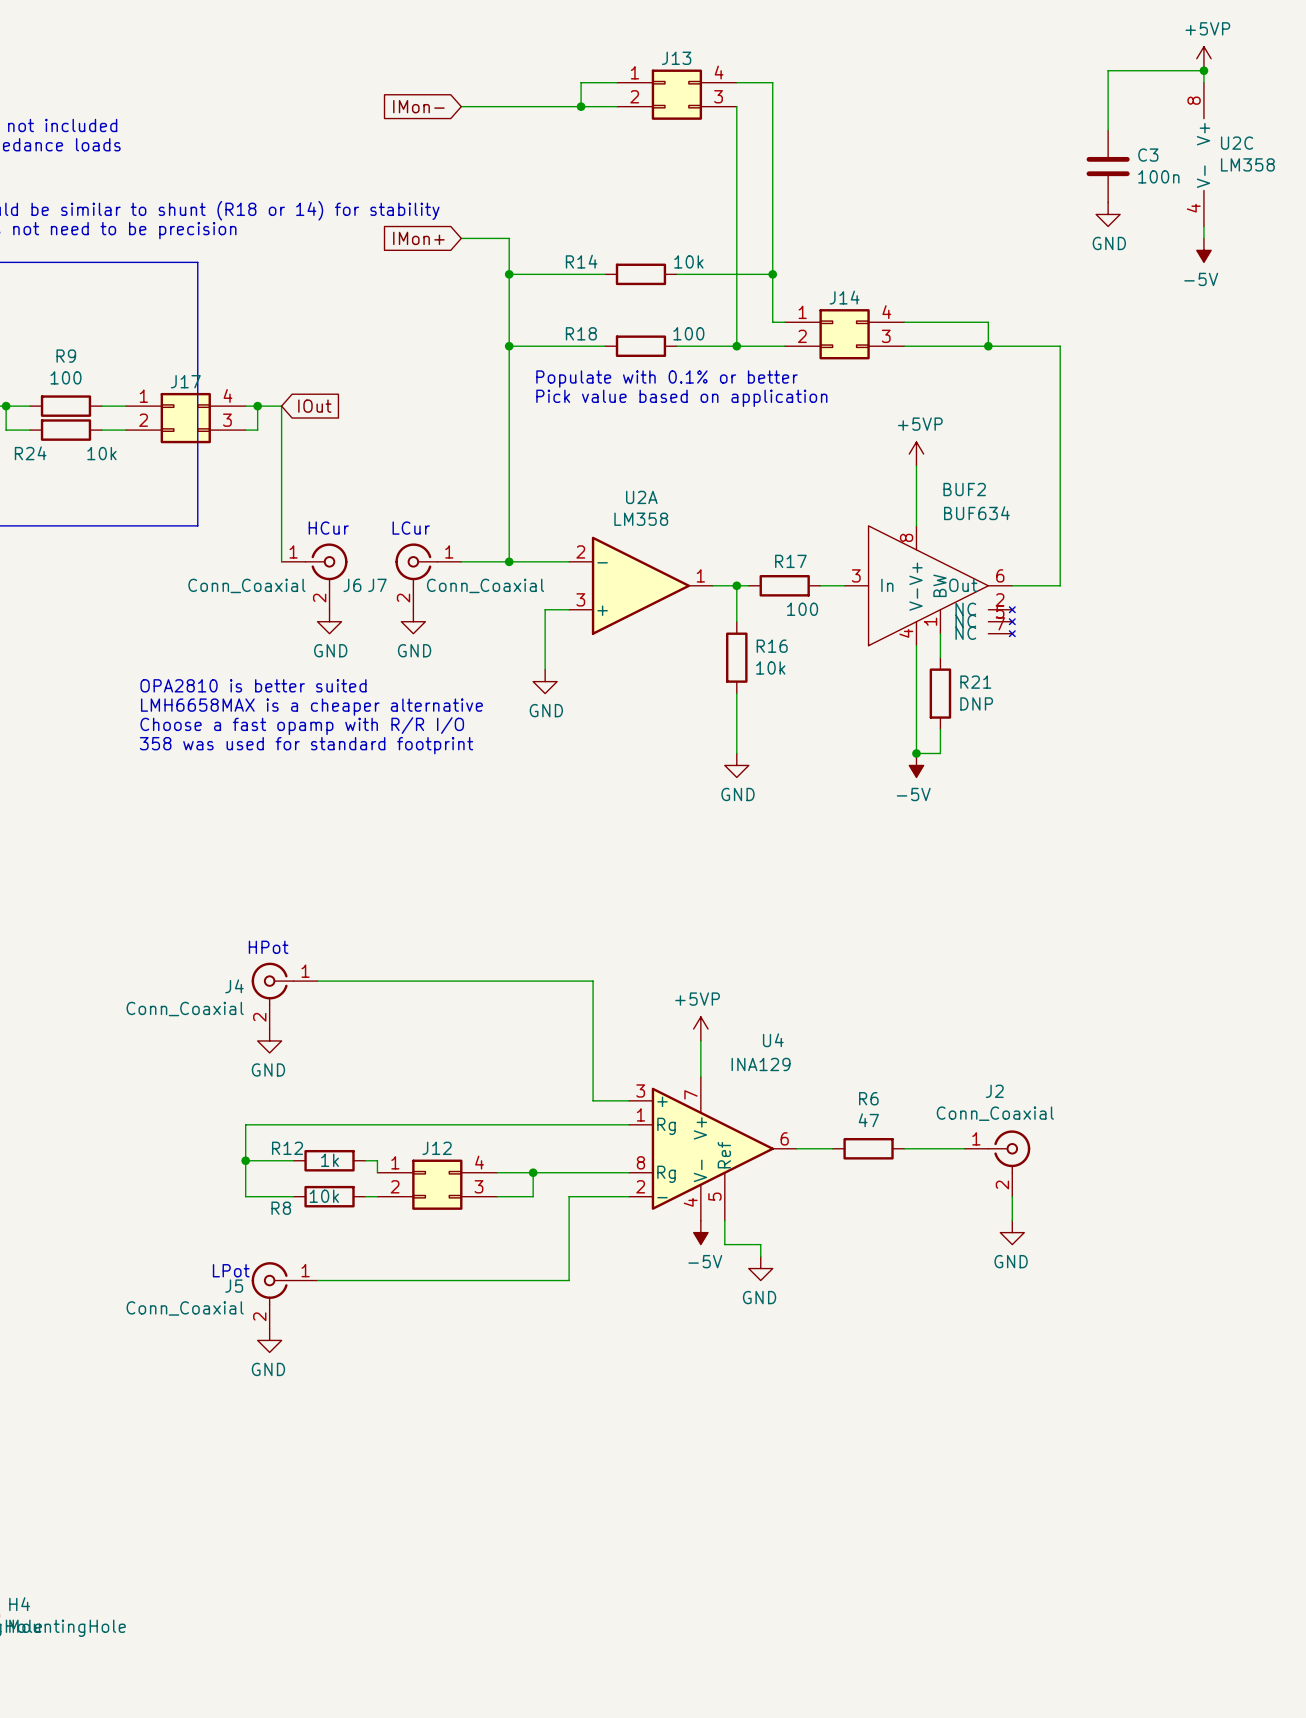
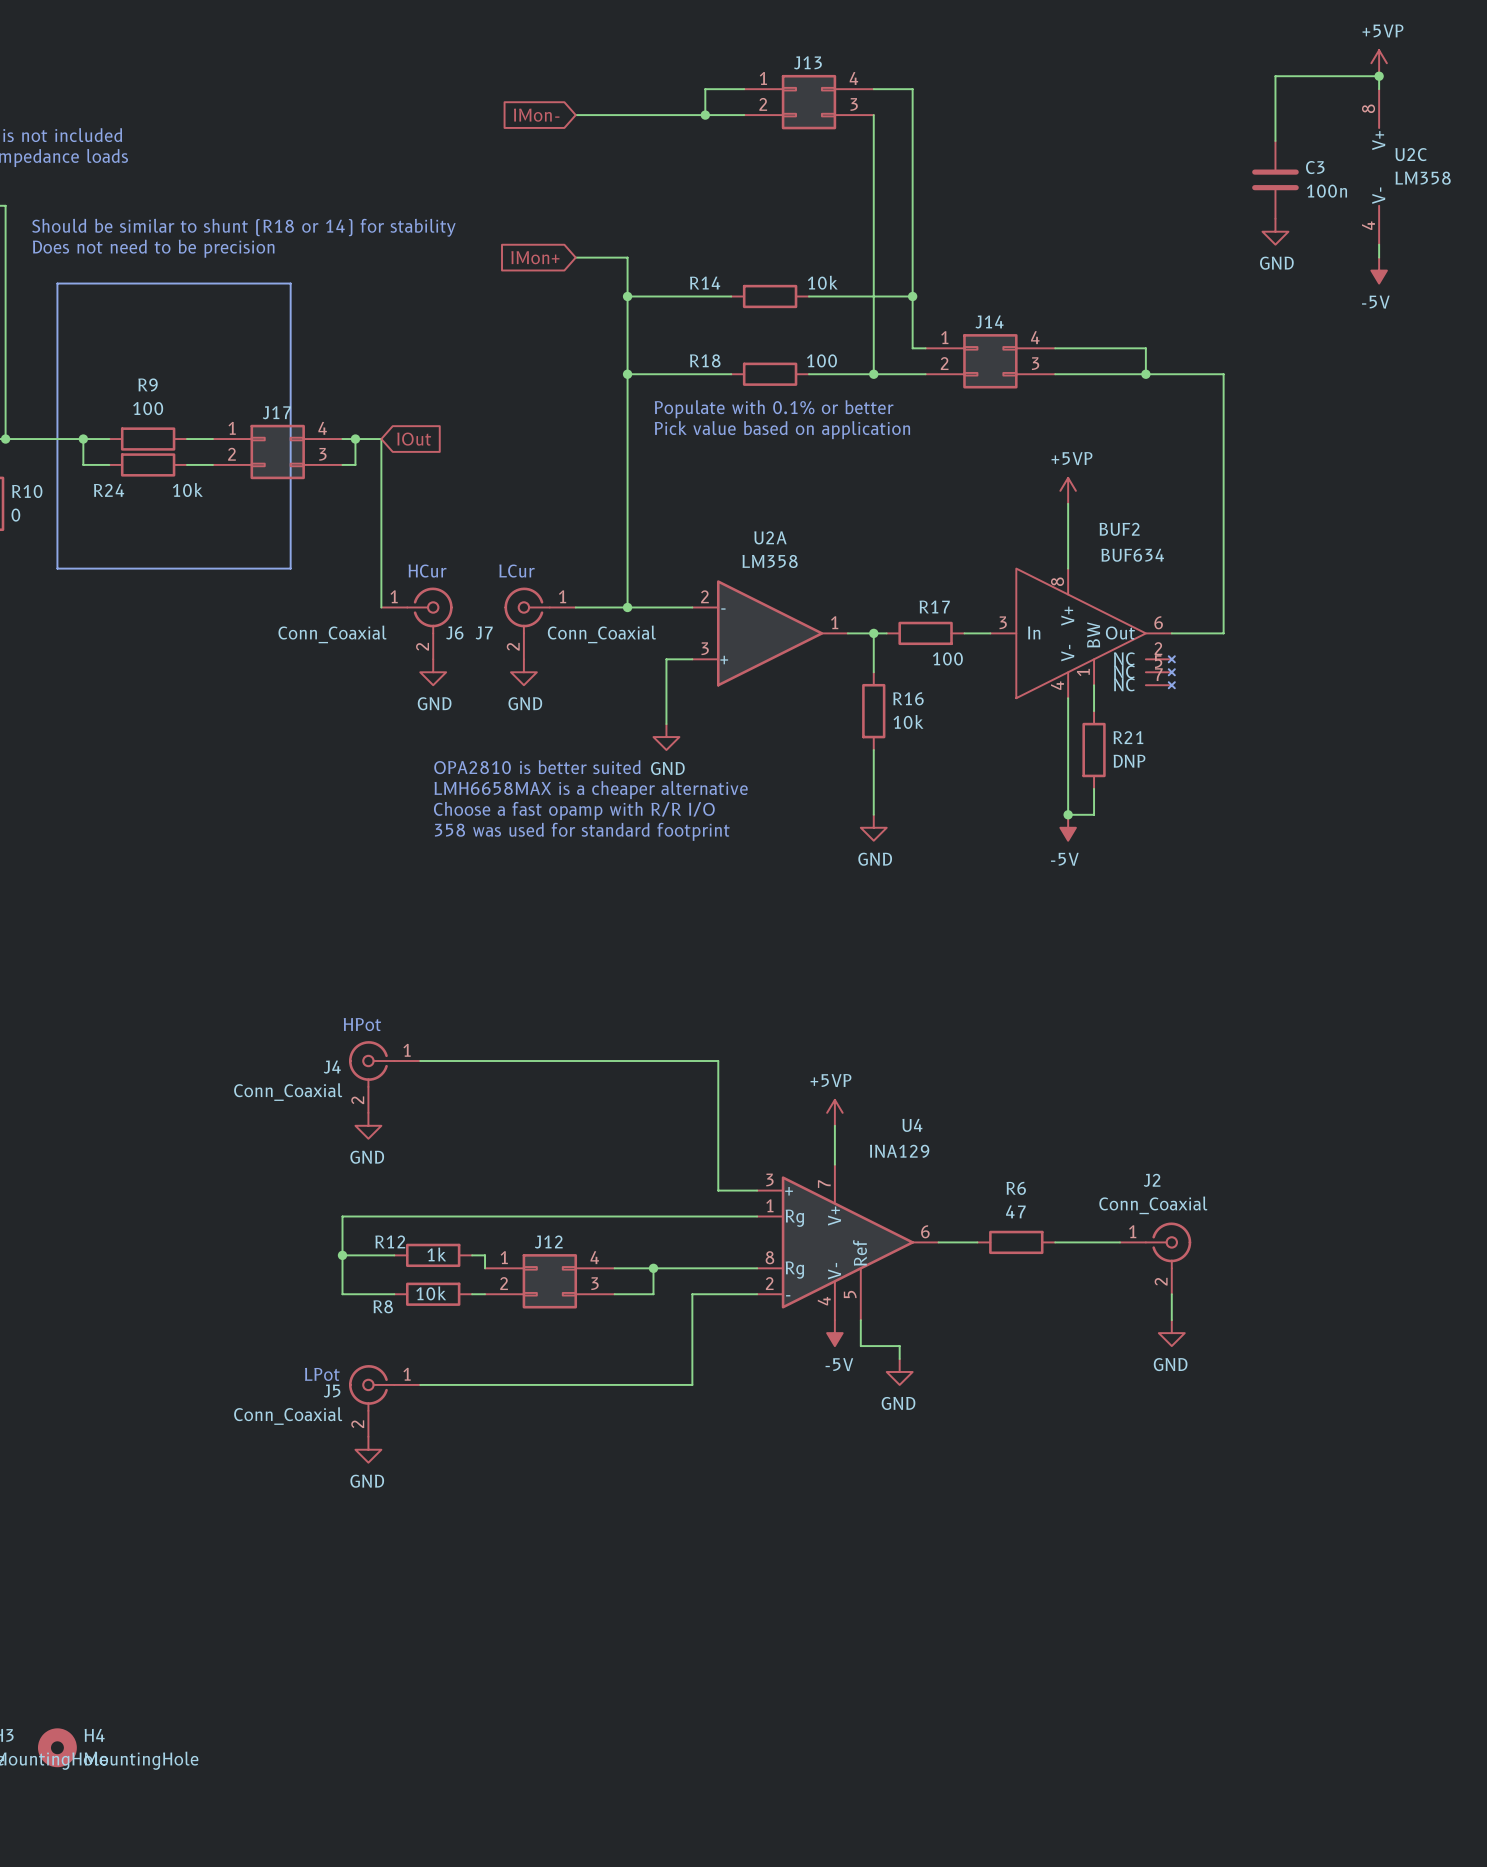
text position: OPA2810 is better suited (253, 685) -> OPA2810 is better suited (537, 767)
text position: LMH6658MAX is a cheaper alternative (311, 707) -> LMH6658MAX is a cheaper alternative (591, 790)
text position: Choose a fast opamp with R/R I/O (302, 726) -> Choose a fast opamp with R/R I/O (574, 810)
text position: 358 was used for standard footprint (306, 745) -> 358 was used for standard footprint (582, 831)

